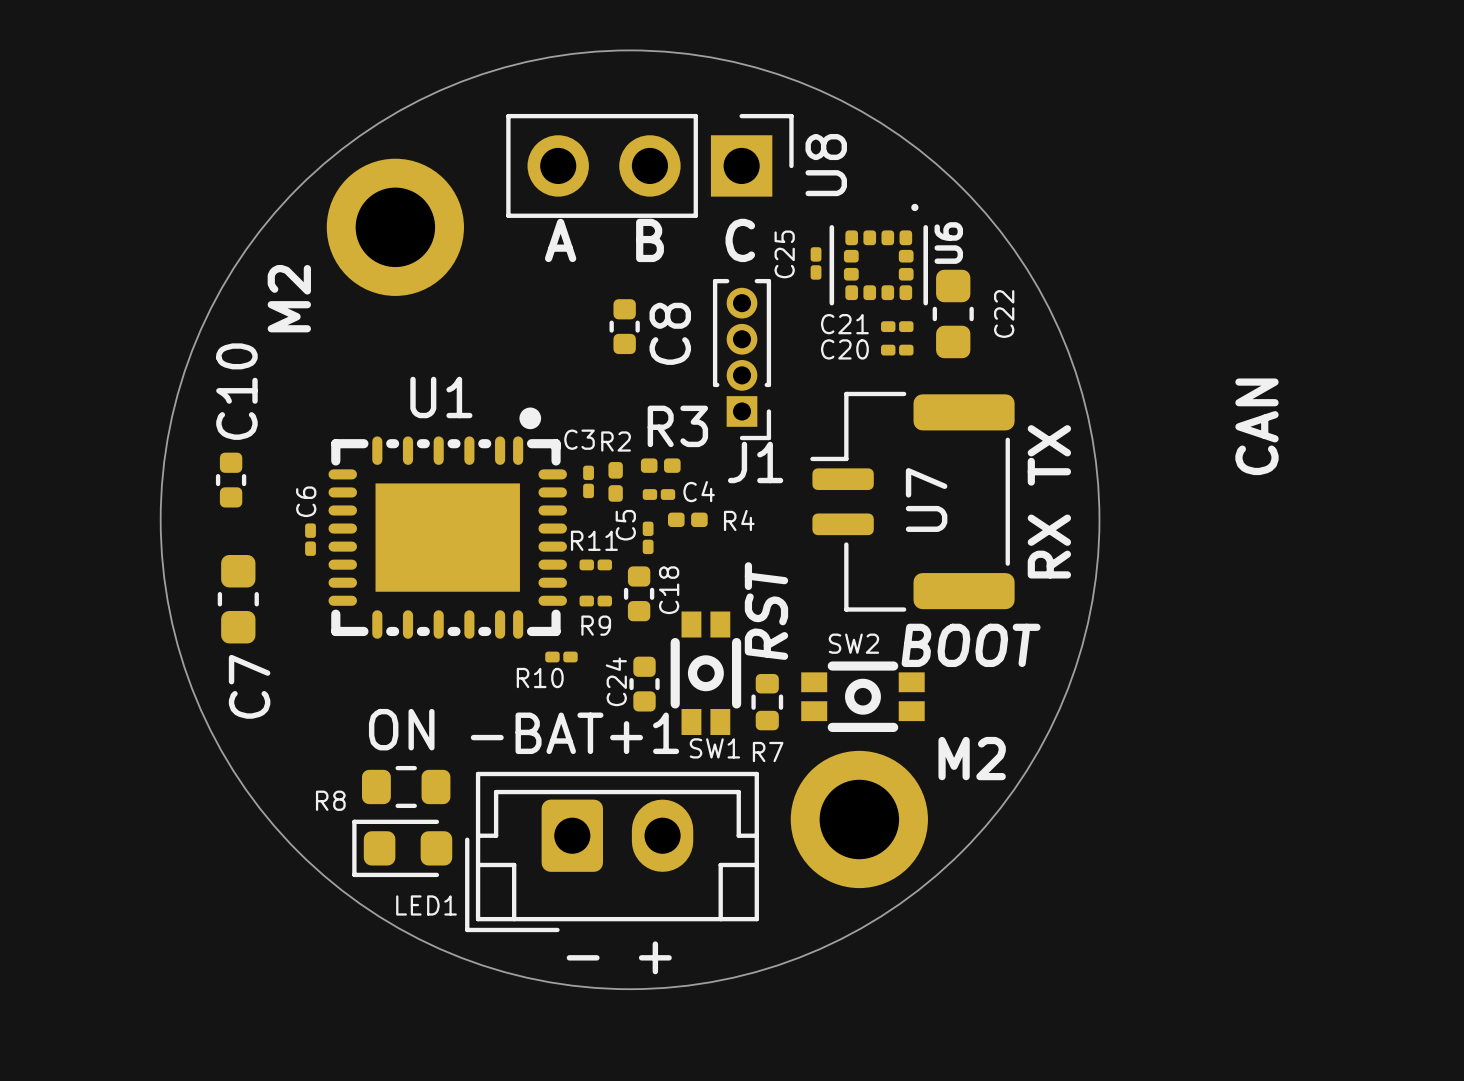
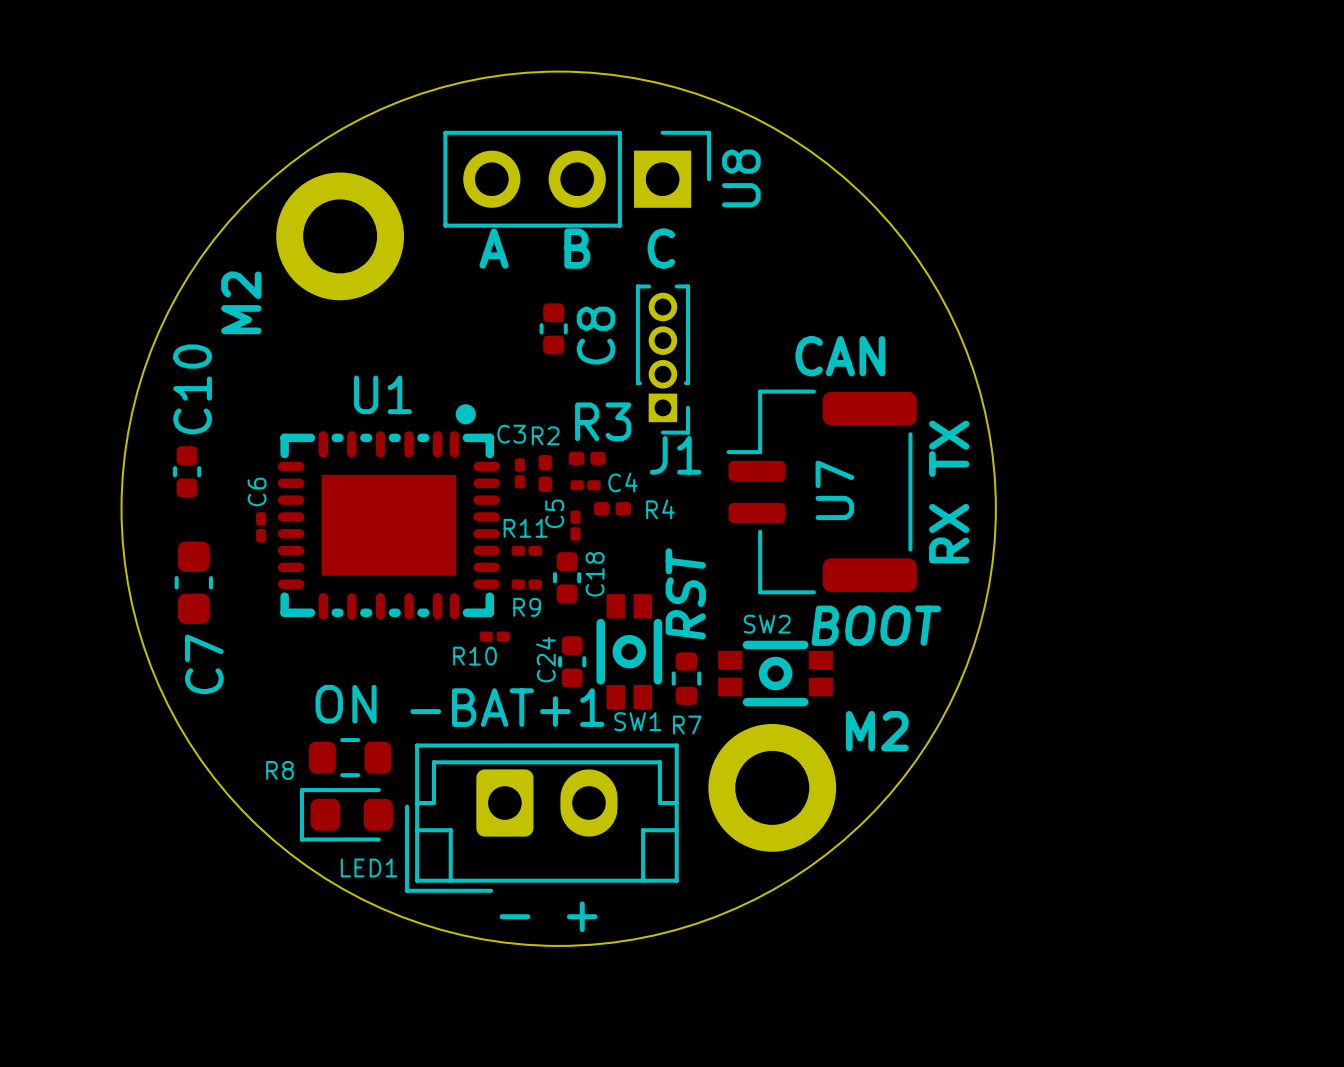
U6: (878, 254) -> none
C25: (816, 263) -> none
C22: (953, 313) -> none
C21: (897, 326) -> none
C20: (897, 350) -> none
text rotation: 0° (1256, 426) -> 90° clockwise (840, 356)
text position: CAN (1256, 426) -> CAN (840, 356)

